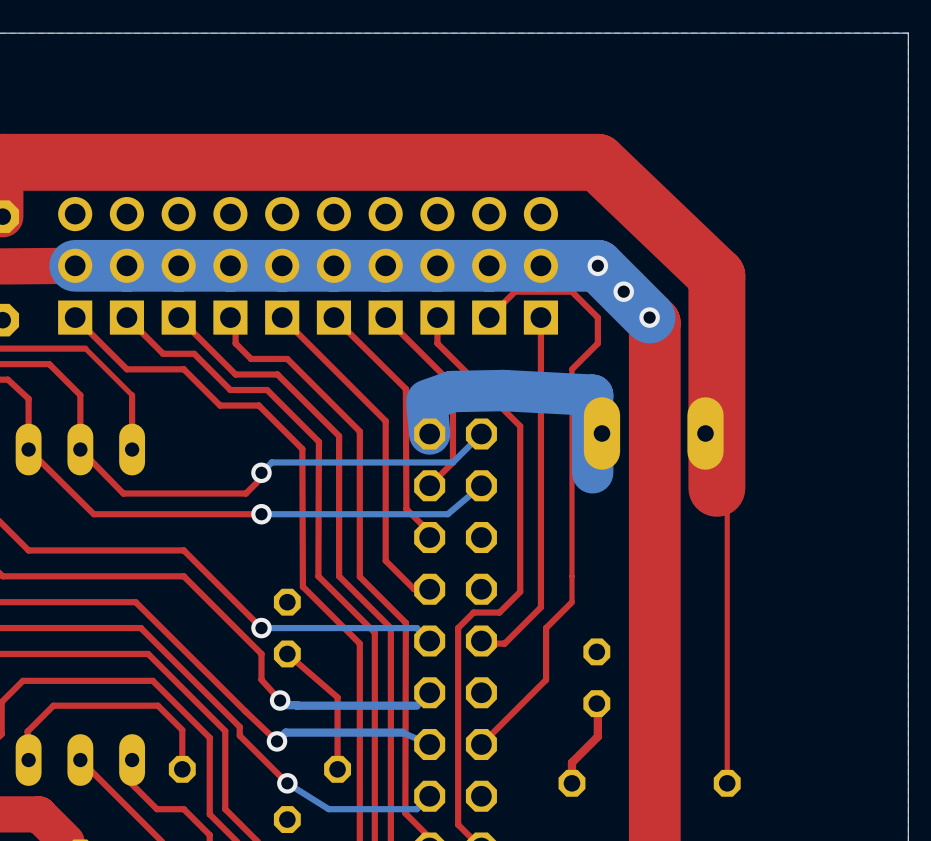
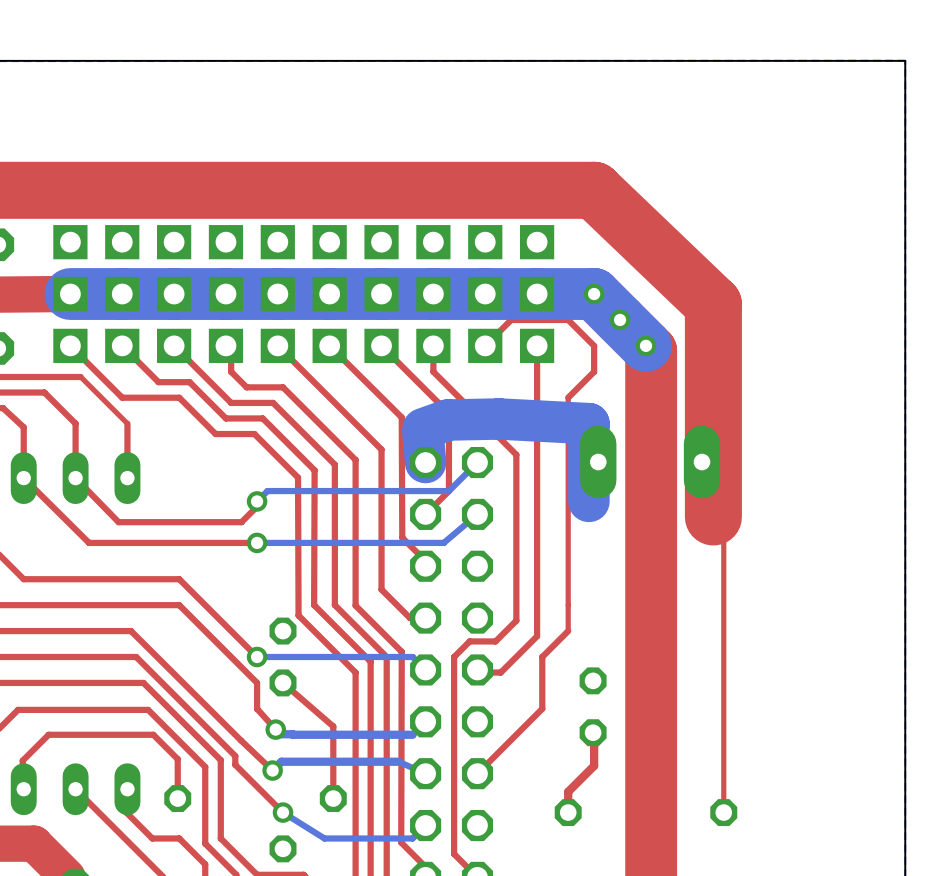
part footprint: [58, 196, 93, 335] -> [53, 225, 88, 363]
part footprint: [109, 196, 145, 335] -> [105, 225, 140, 363]
part footprint: [161, 196, 196, 335] -> [157, 225, 192, 363]
part footprint: [213, 196, 248, 335] -> [208, 225, 244, 363]
part footprint: [265, 196, 300, 335] -> [260, 225, 295, 363]
part footprint: [316, 196, 352, 335] -> [312, 225, 347, 363]
part footprint: [368, 196, 403, 335] -> [364, 225, 399, 363]
part footprint: [420, 196, 455, 335] -> [416, 225, 451, 363]
part footprint: [472, 196, 507, 335] -> [468, 225, 503, 363]
part footprint: [523, 196, 559, 335] -> [519, 225, 555, 363]

